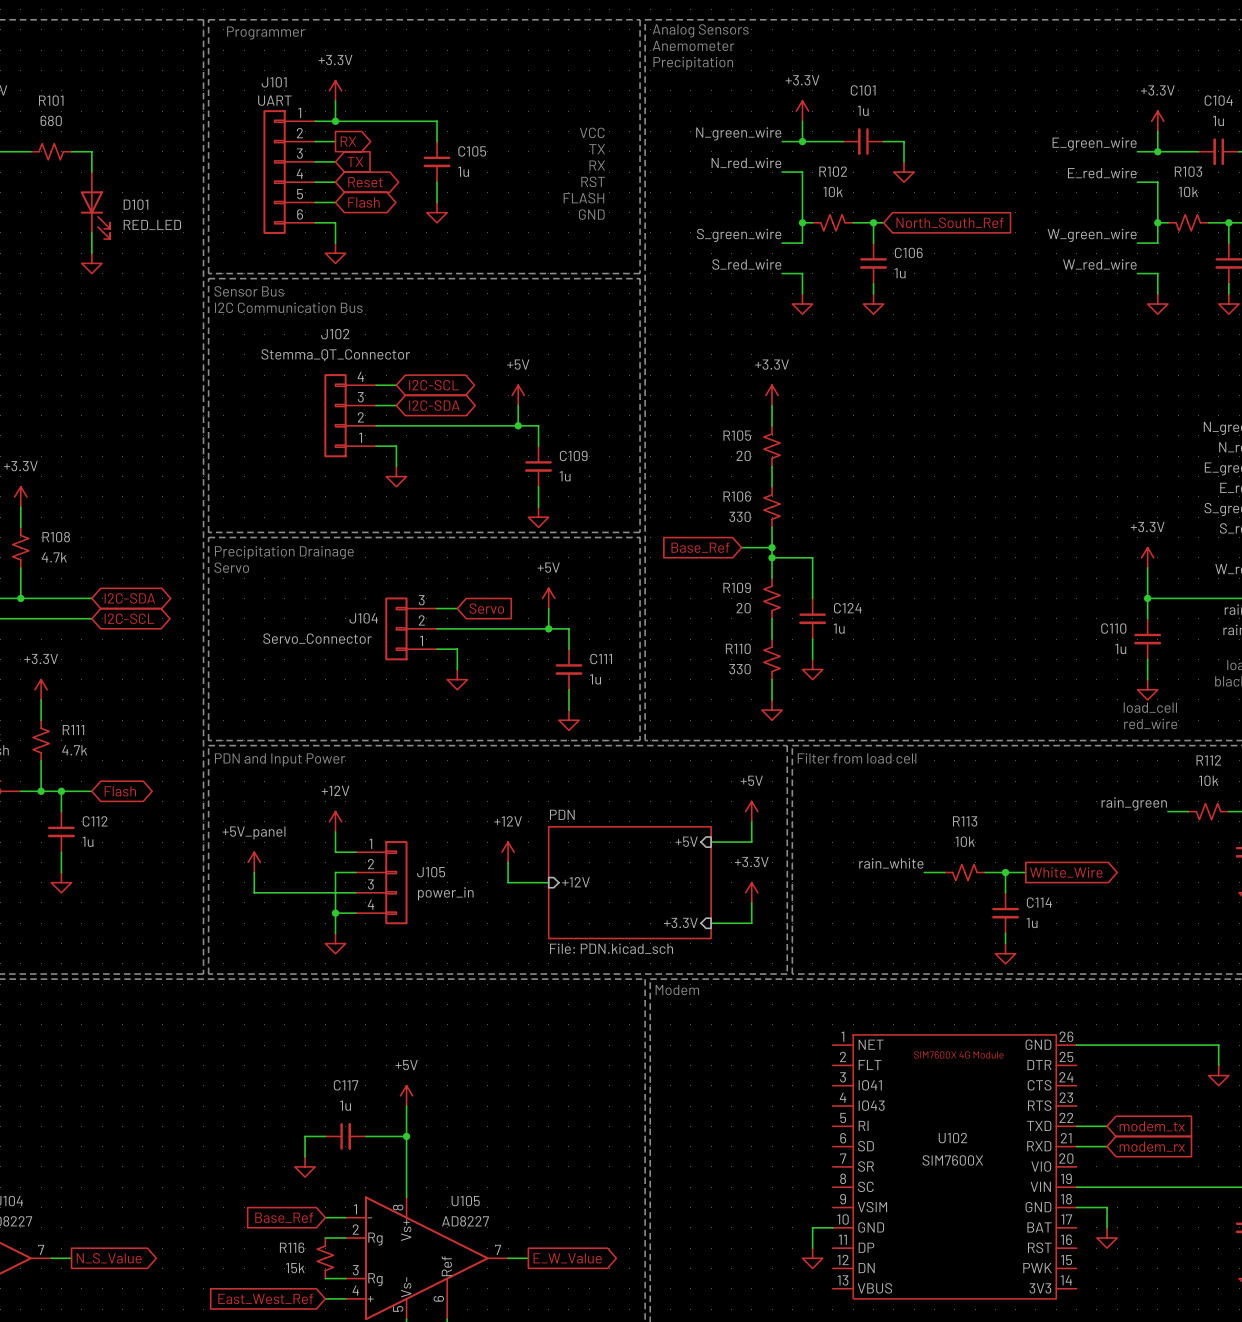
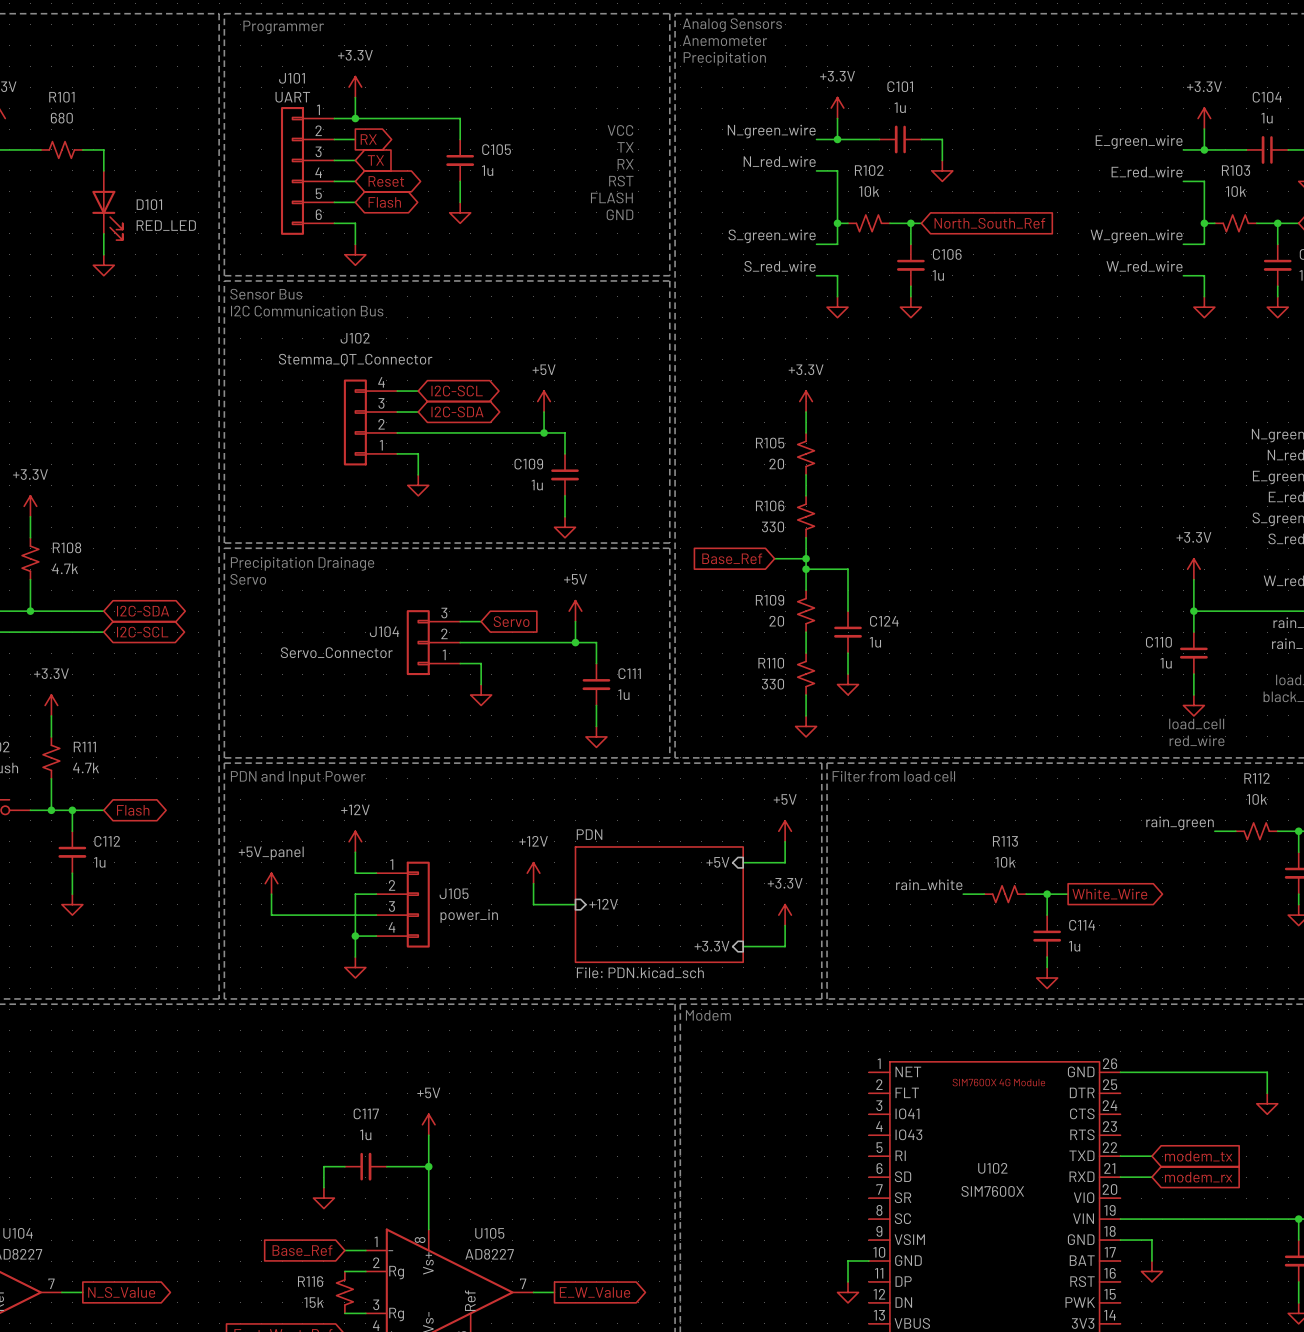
C109 name position: C109 (573, 455) -> C109 (528, 464)
C109 value position: 1u (565, 476) -> 1u (537, 485)

